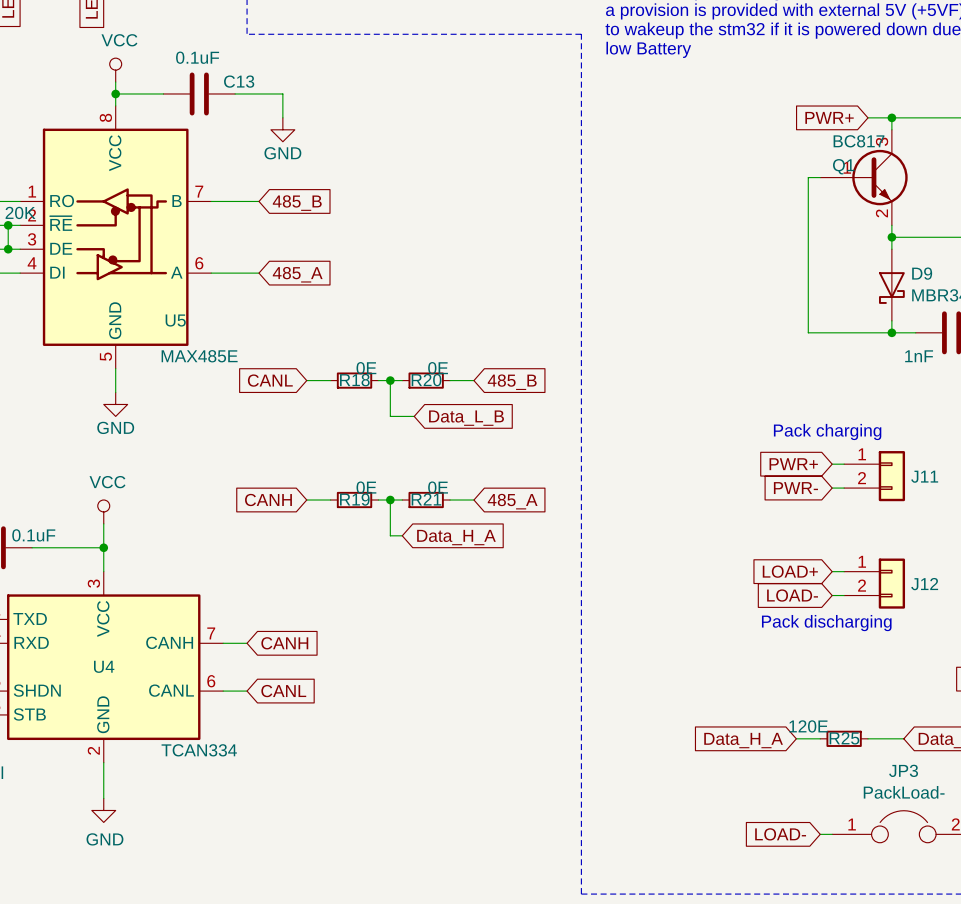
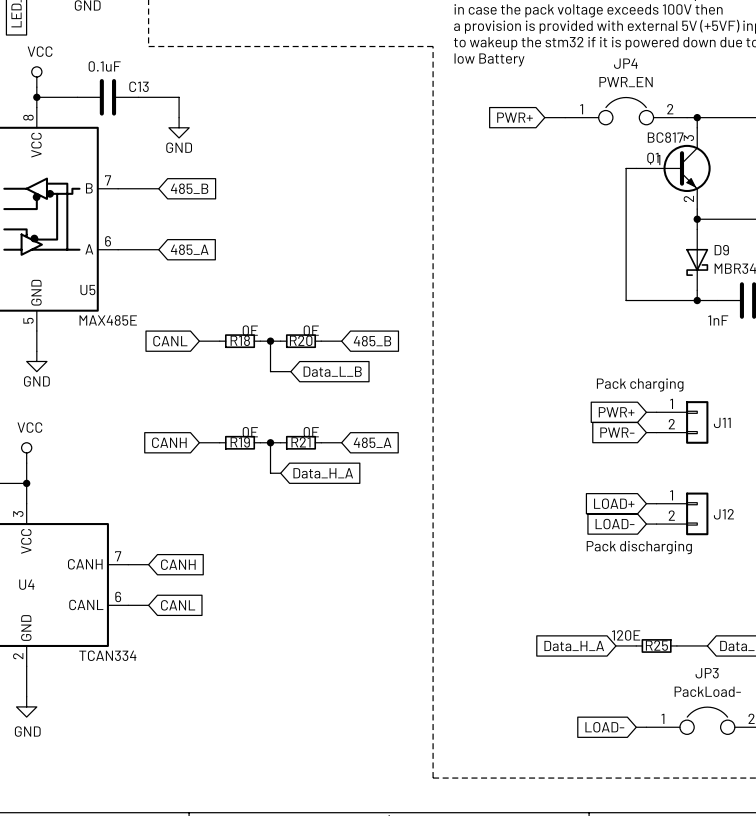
JP4: none -> PWR_EN (626, 111)
wire: none -> (544, 117) (565, 117)
global label position: PWR+ (829, 117) -> PWR+ (515, 117)

